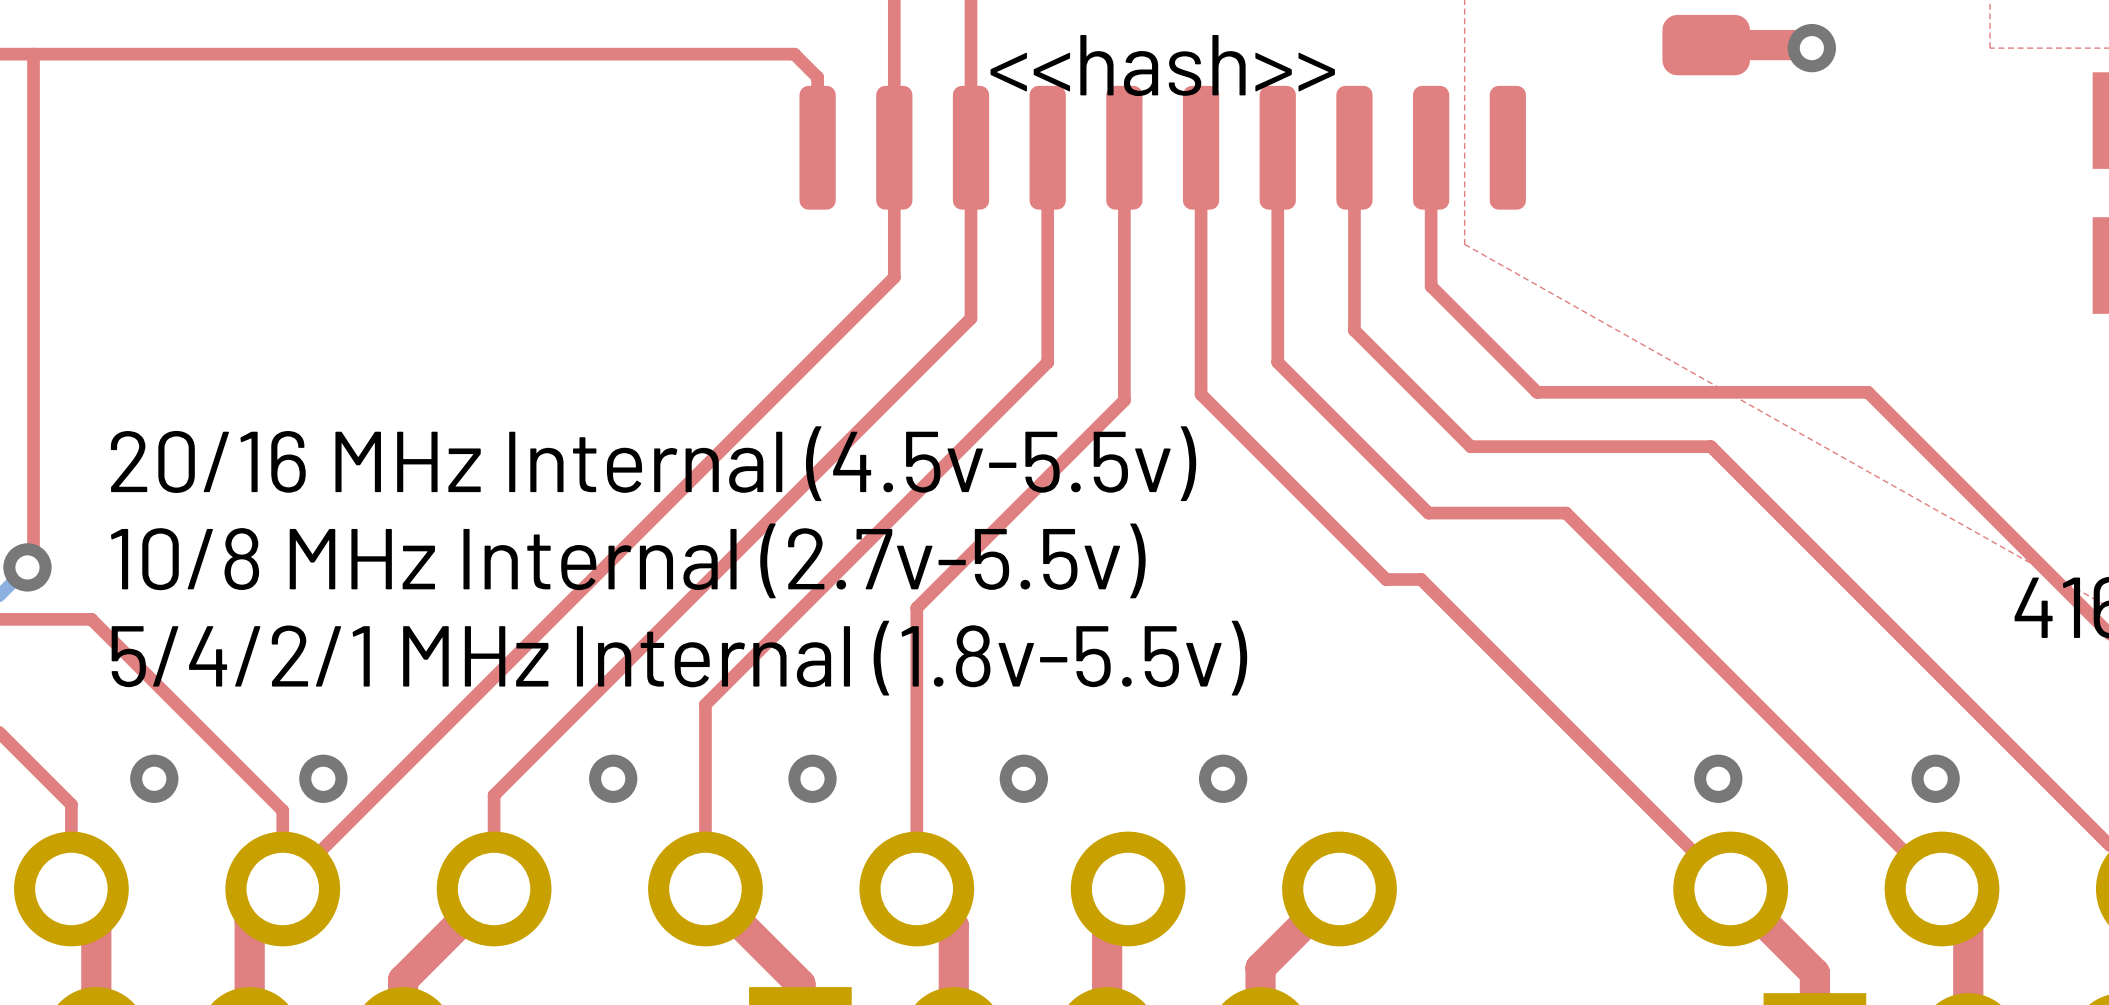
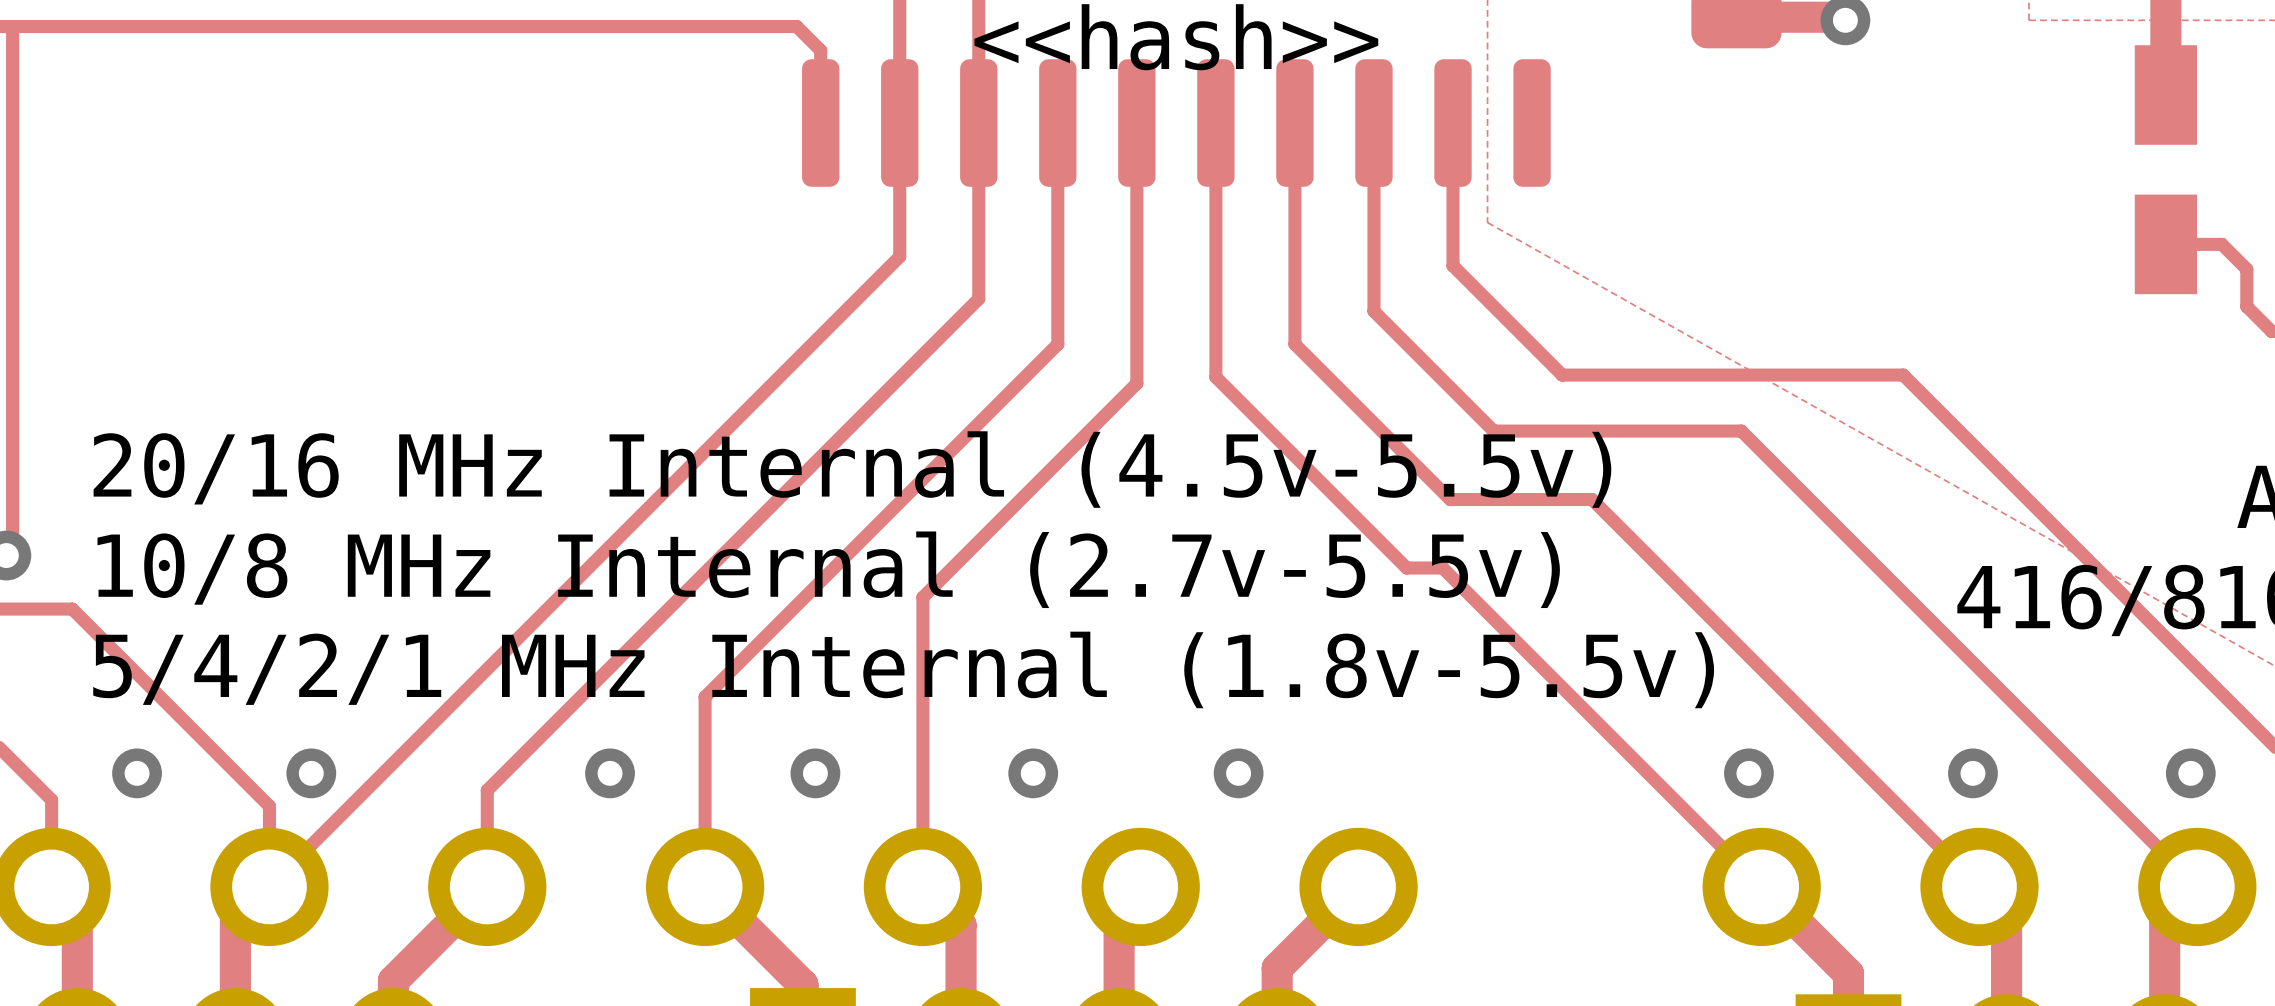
text position: 20/16 MHz Internal (4.5v-5.5v) (653, 463) -> 20/16 MHz Internal (4.5v-5.5v) (852, 469)
text position: 10/8 MHz Internal (2.7v-5.5v) (628, 560) -> 10/8 MHz Internal (2.7v-5.5v) (828, 569)
text position: 5/4/2/1 MHz Internal (1.8v-5.5v) (679, 658) -> 5/4/2/1 MHz Internal (1.8v-5.5v) (903, 669)

